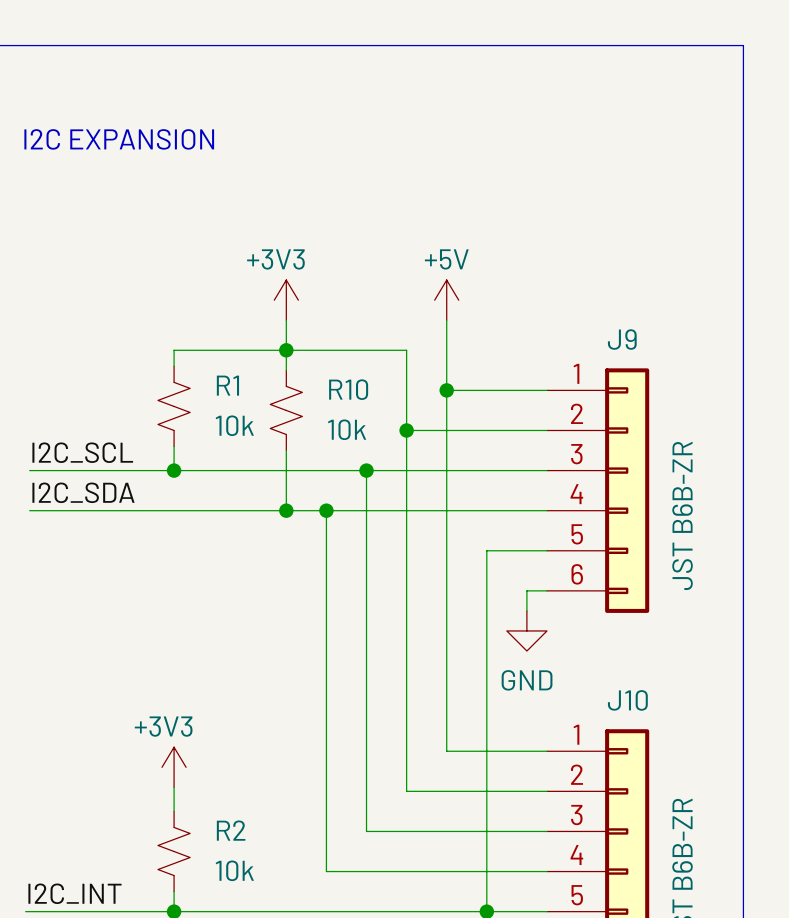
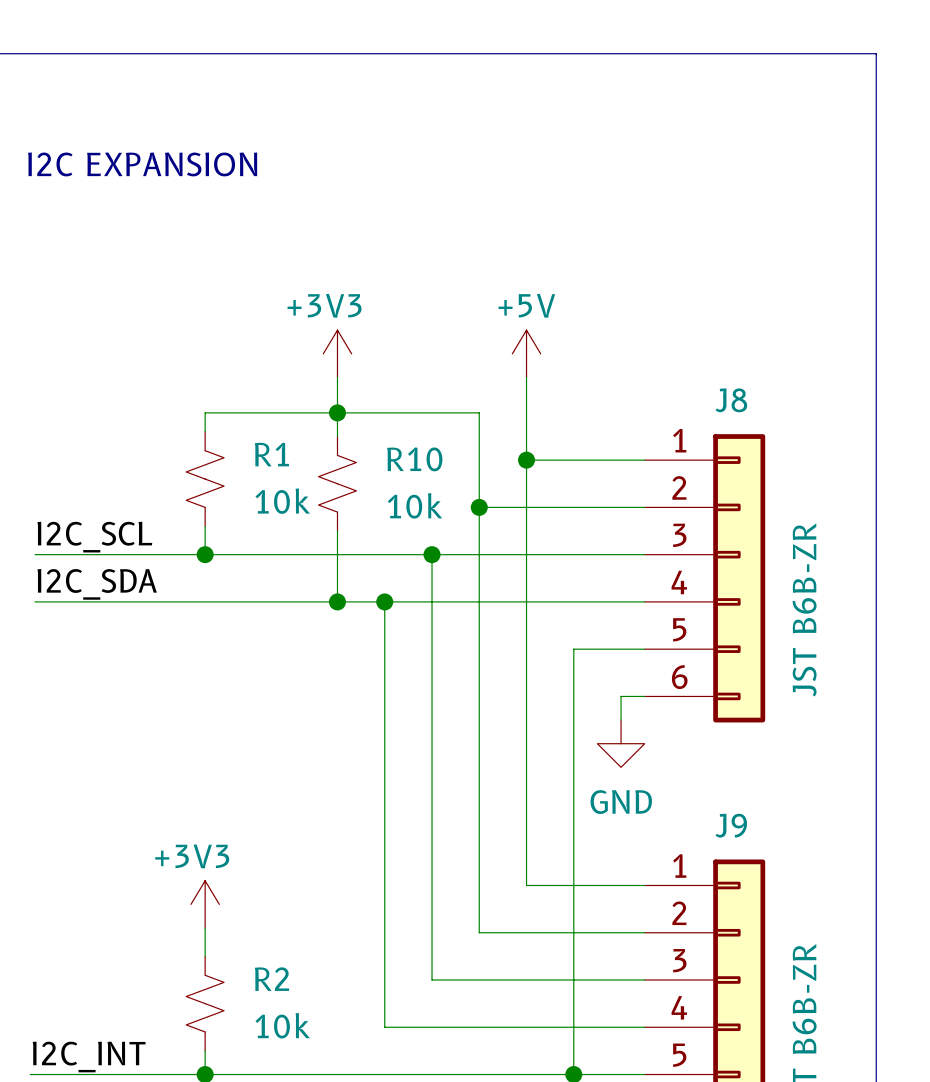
J9 name: J9 (622, 339) -> J8 (731, 400)
J10 name: J10 (627, 700) -> J9 (731, 825)

